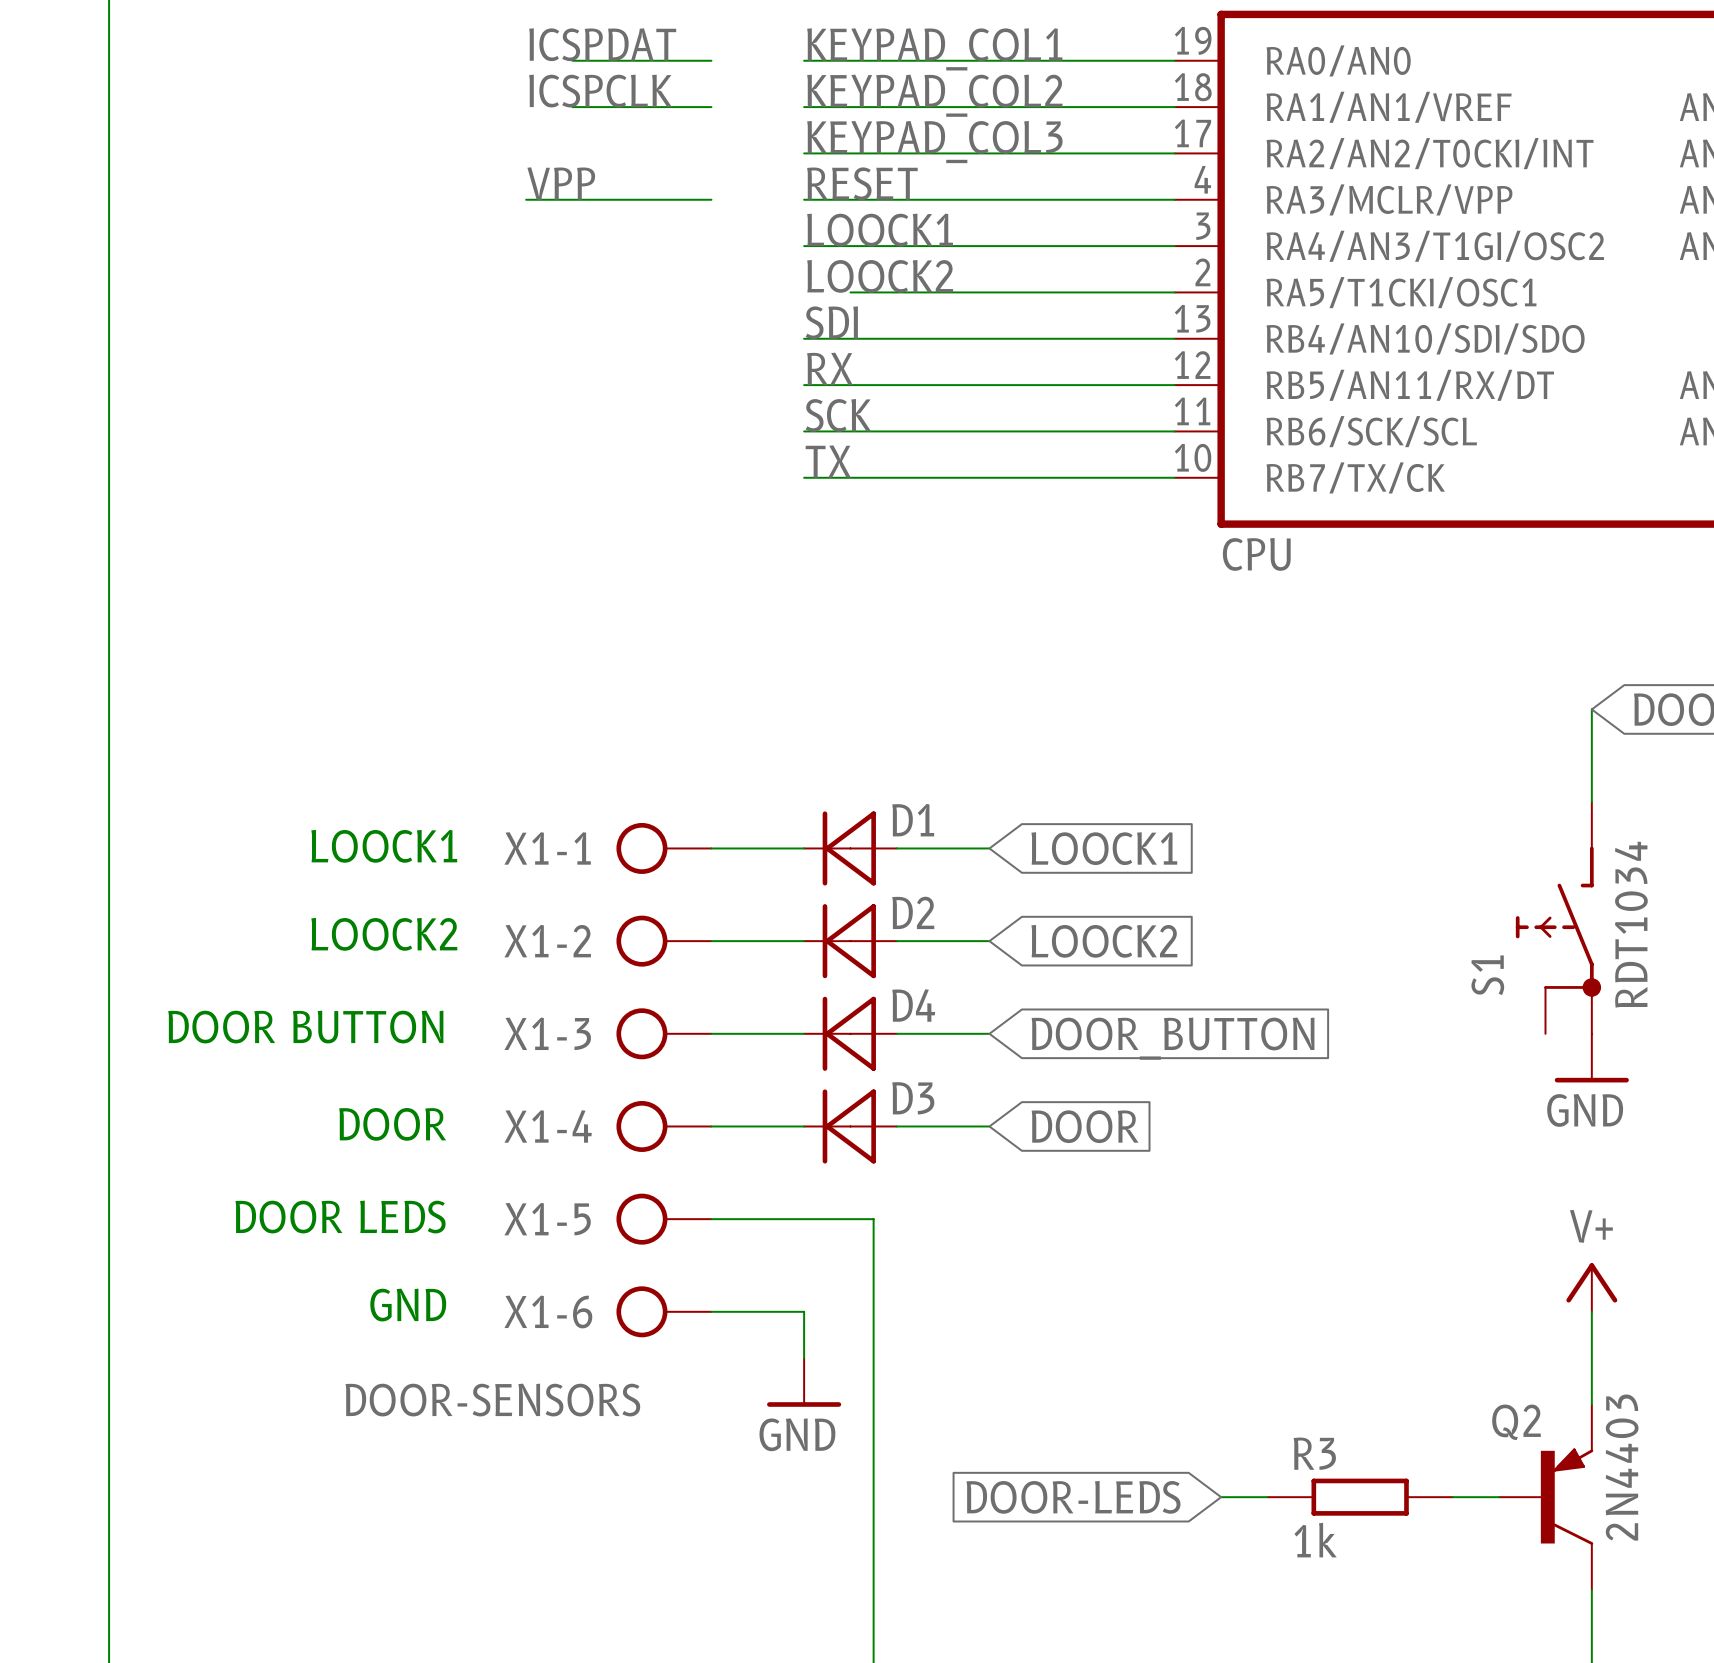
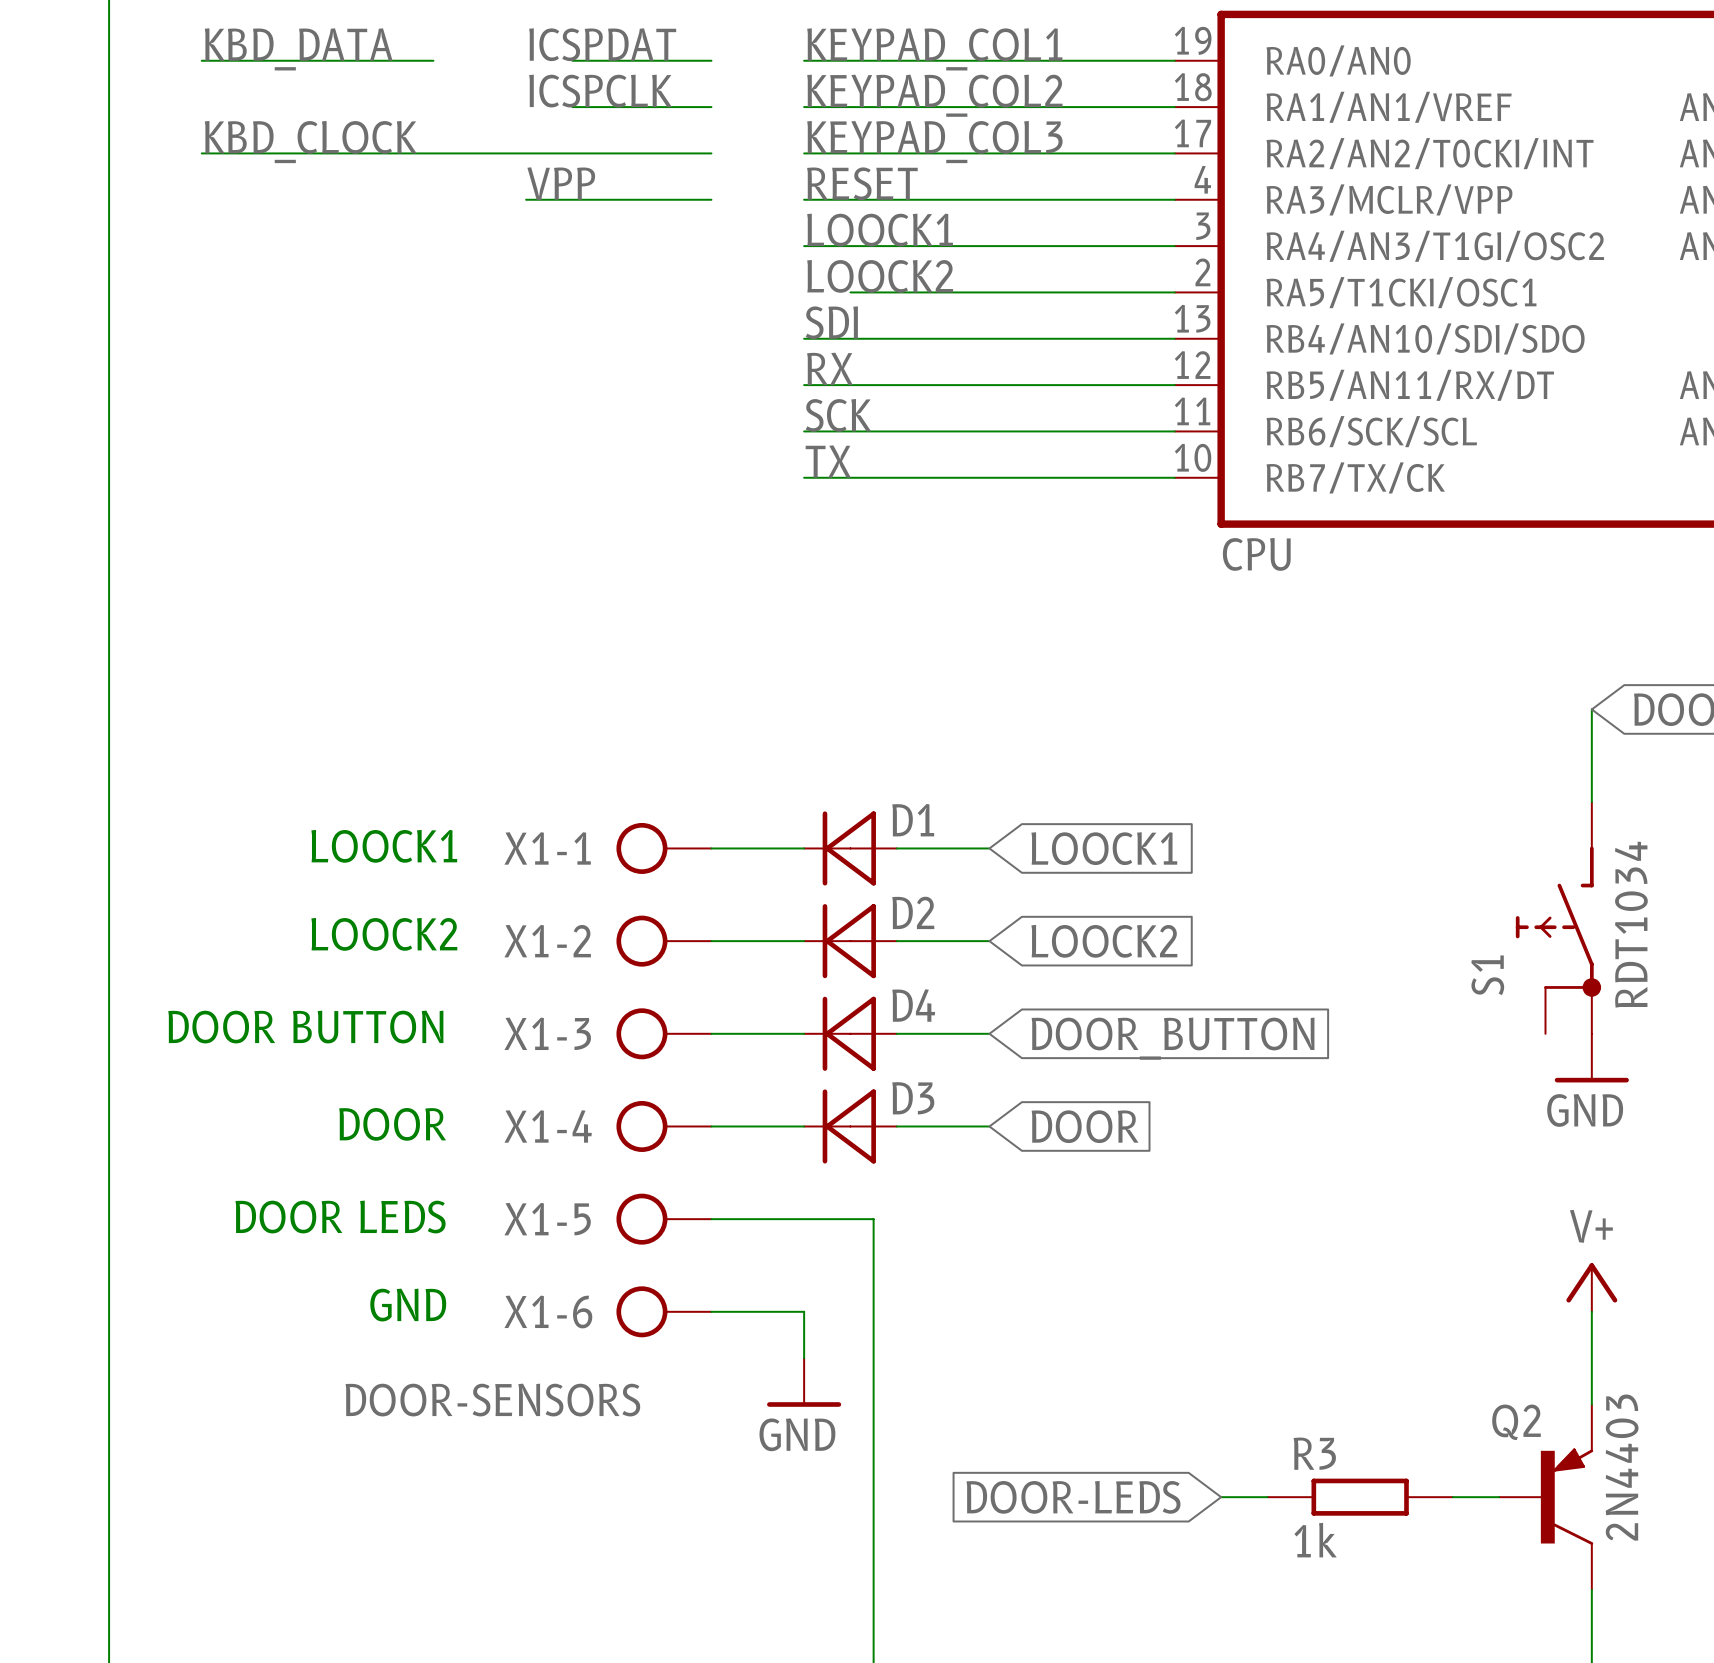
label: none -> KBD_DATA (298, 49)
wire: none -> (201, 60) (433, 60)
label: none -> KBD_CLOCK (310, 142)
wire: none -> (201, 153) (711, 153)

